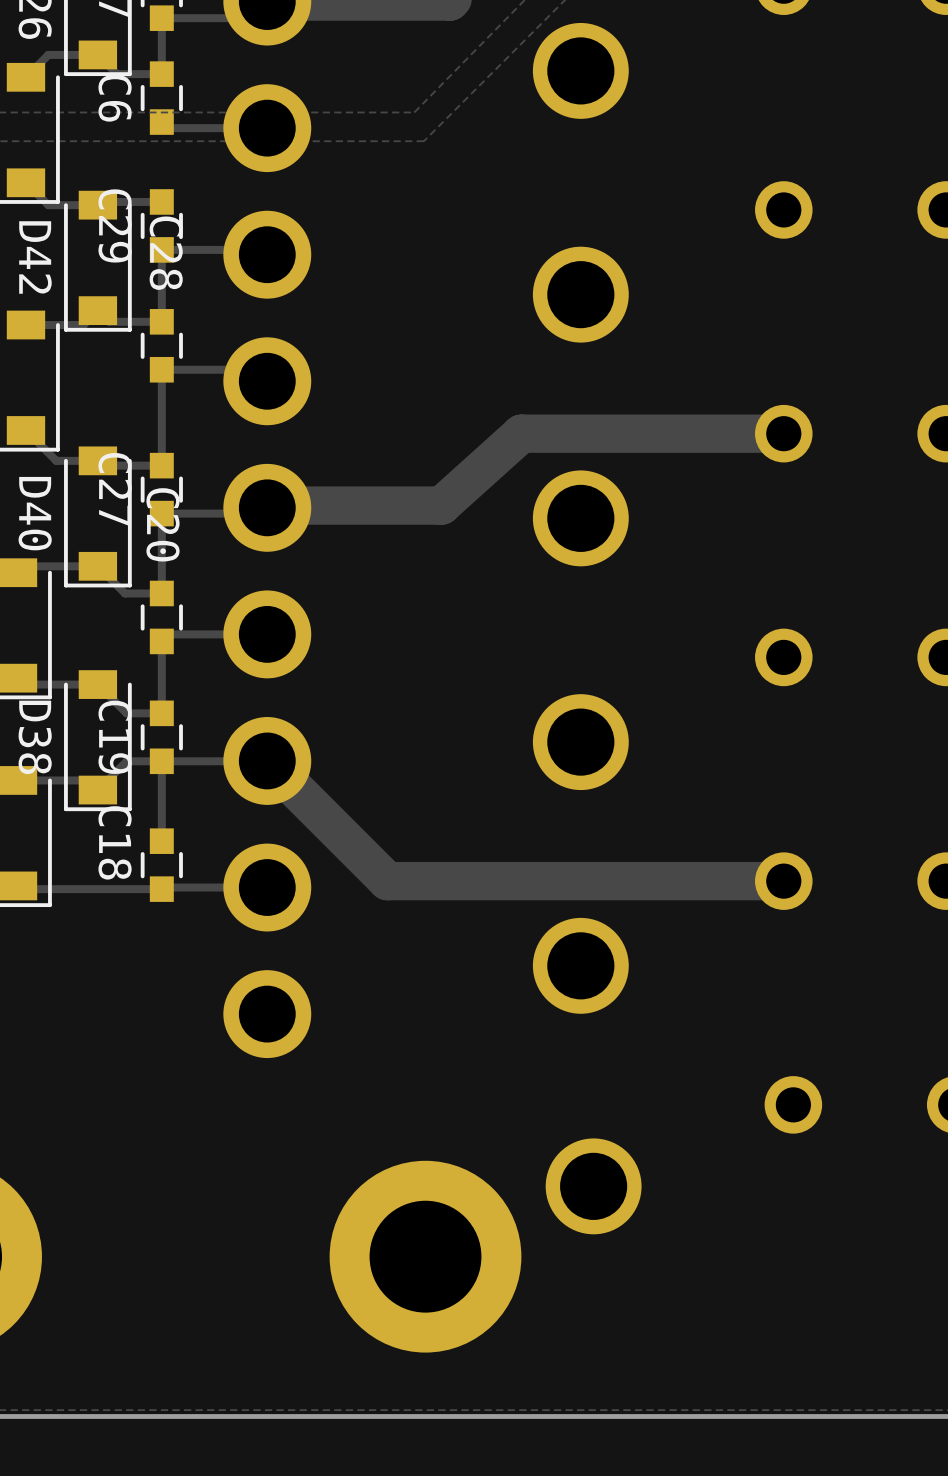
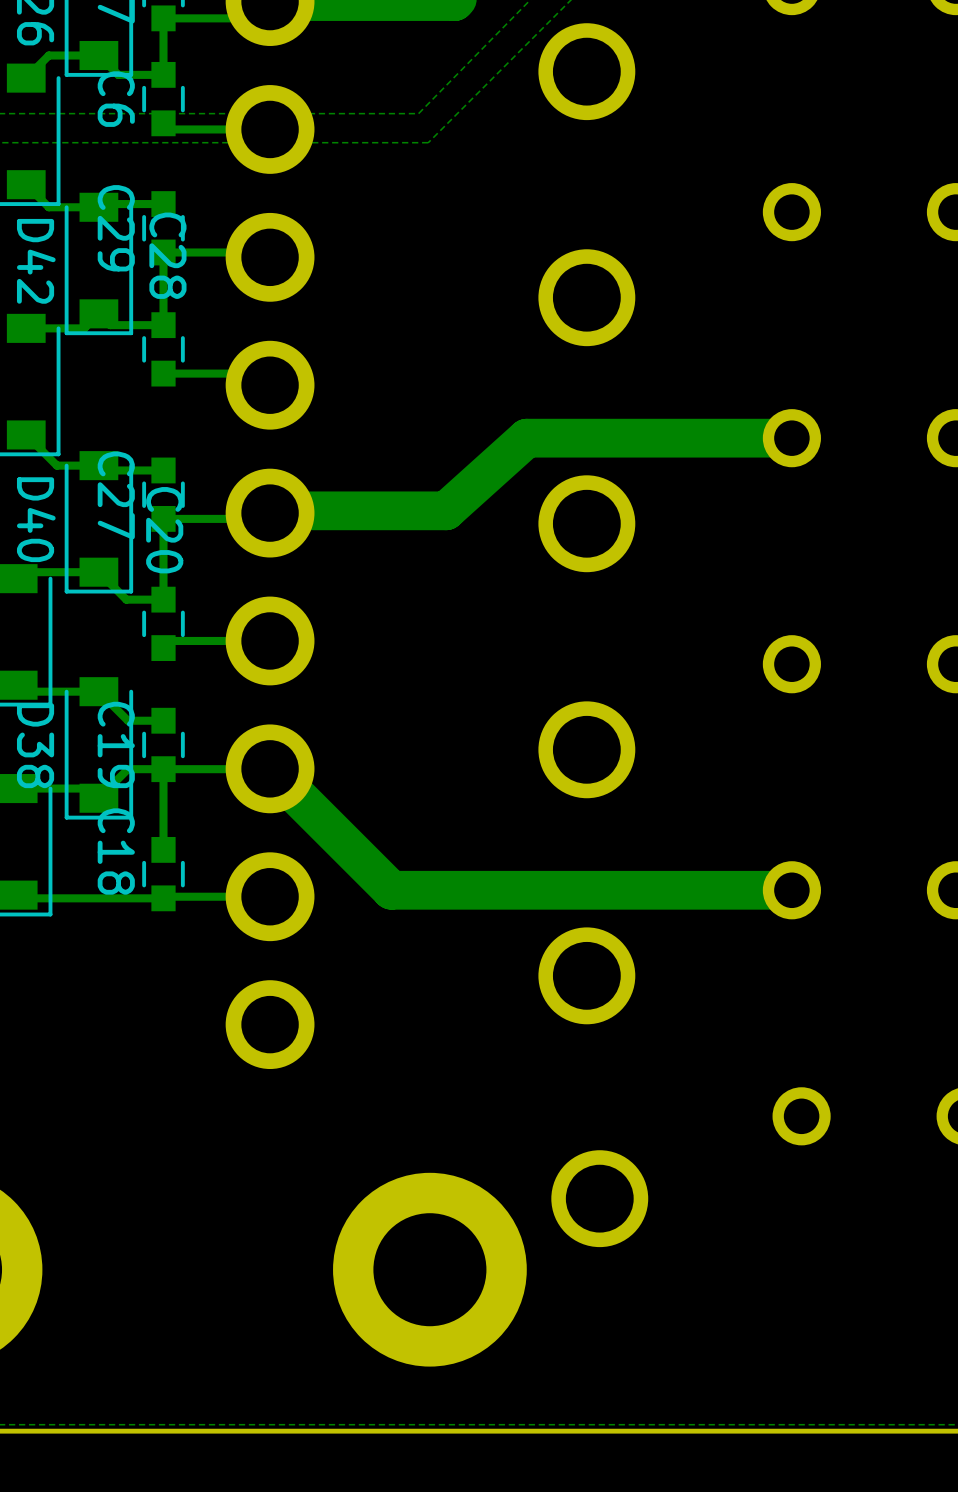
track: (161, 369) (161, 465) -> none
track: (161, 641) (161, 713) -> none

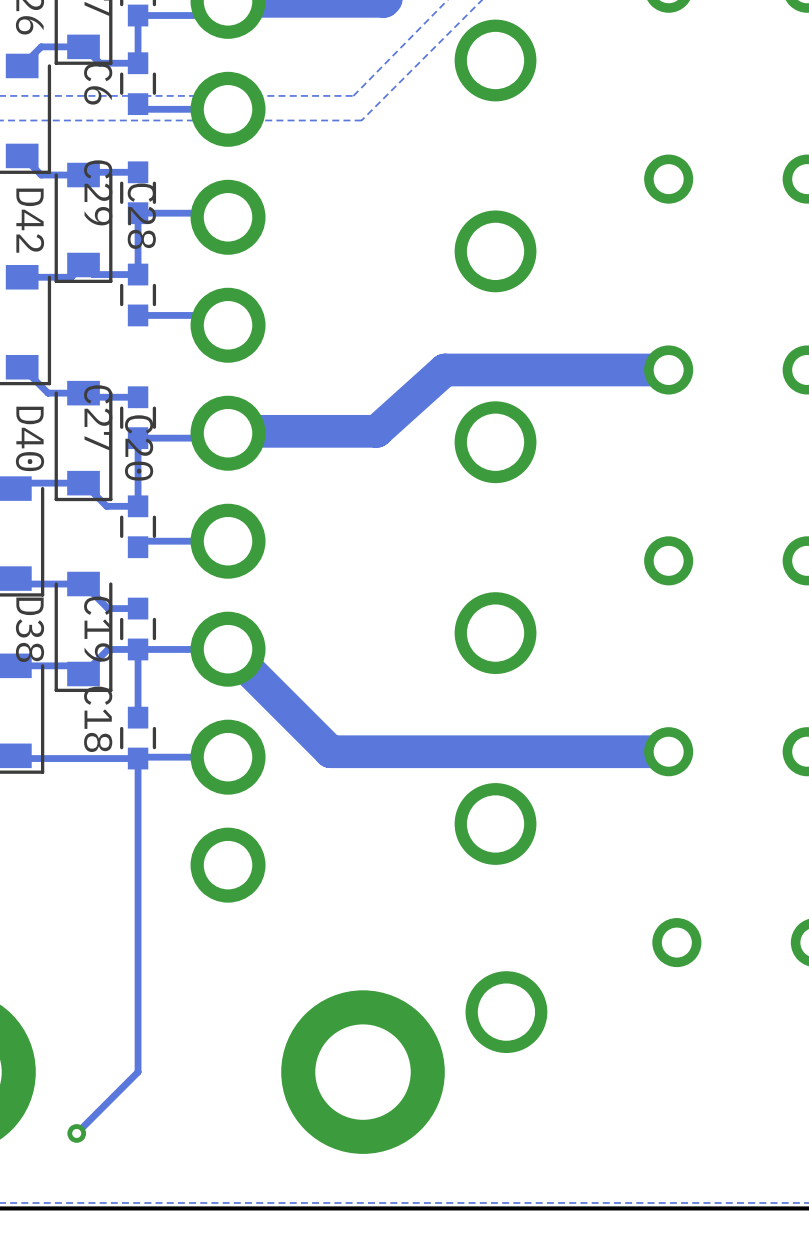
track: none -> (138, 758) (138, 1072) (76, 1133)
via: none -> (76, 1133)

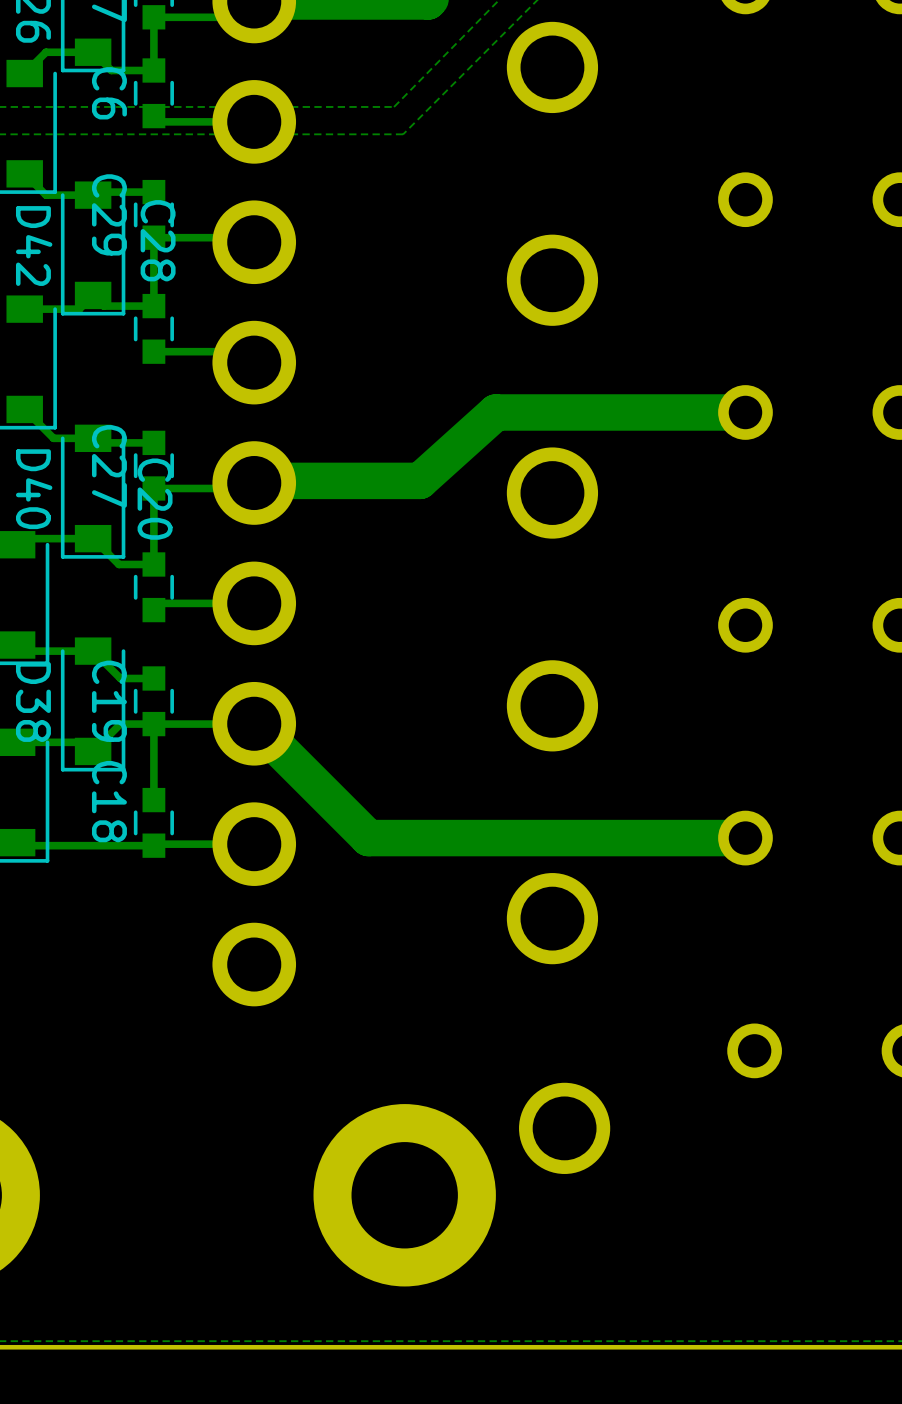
track: (138, 758) (138, 1072) (76, 1133) -> none
via: (76, 1133) -> none

